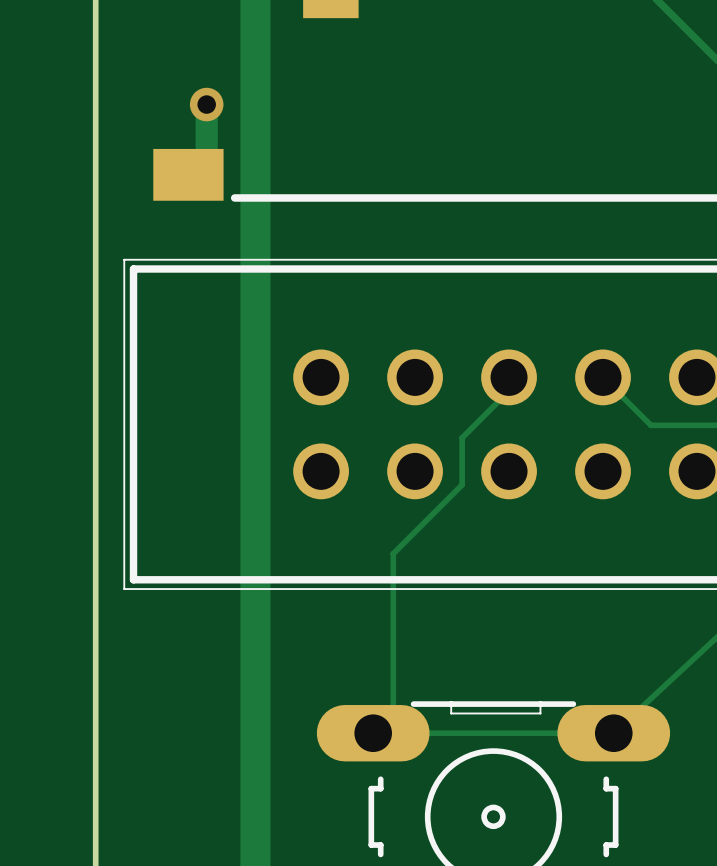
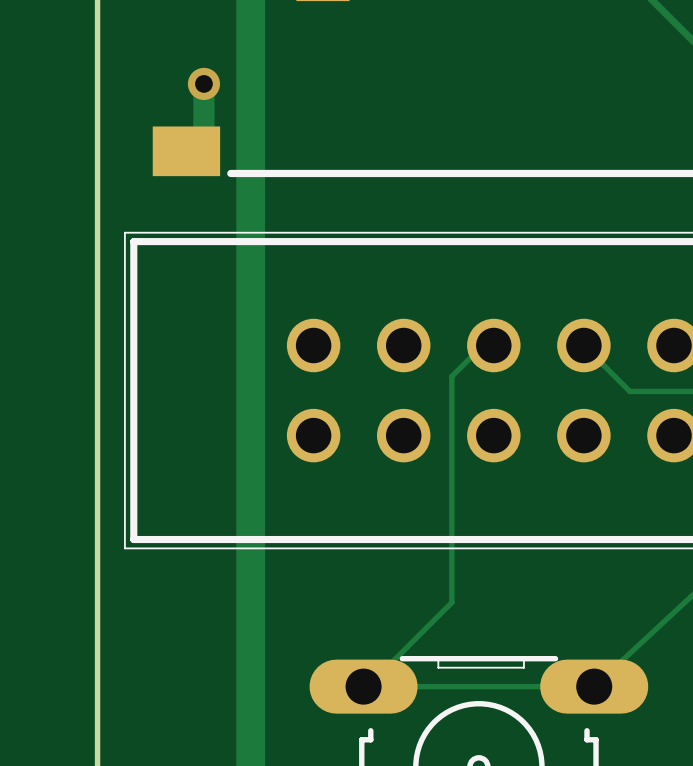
track: (509, 377) (509, 390) (462, 437) (462, 484) (393, 553) (393, 713) (373, 733) -> (493, 345) (482, 345) (451, 376) (451, 602) (367, 686)

